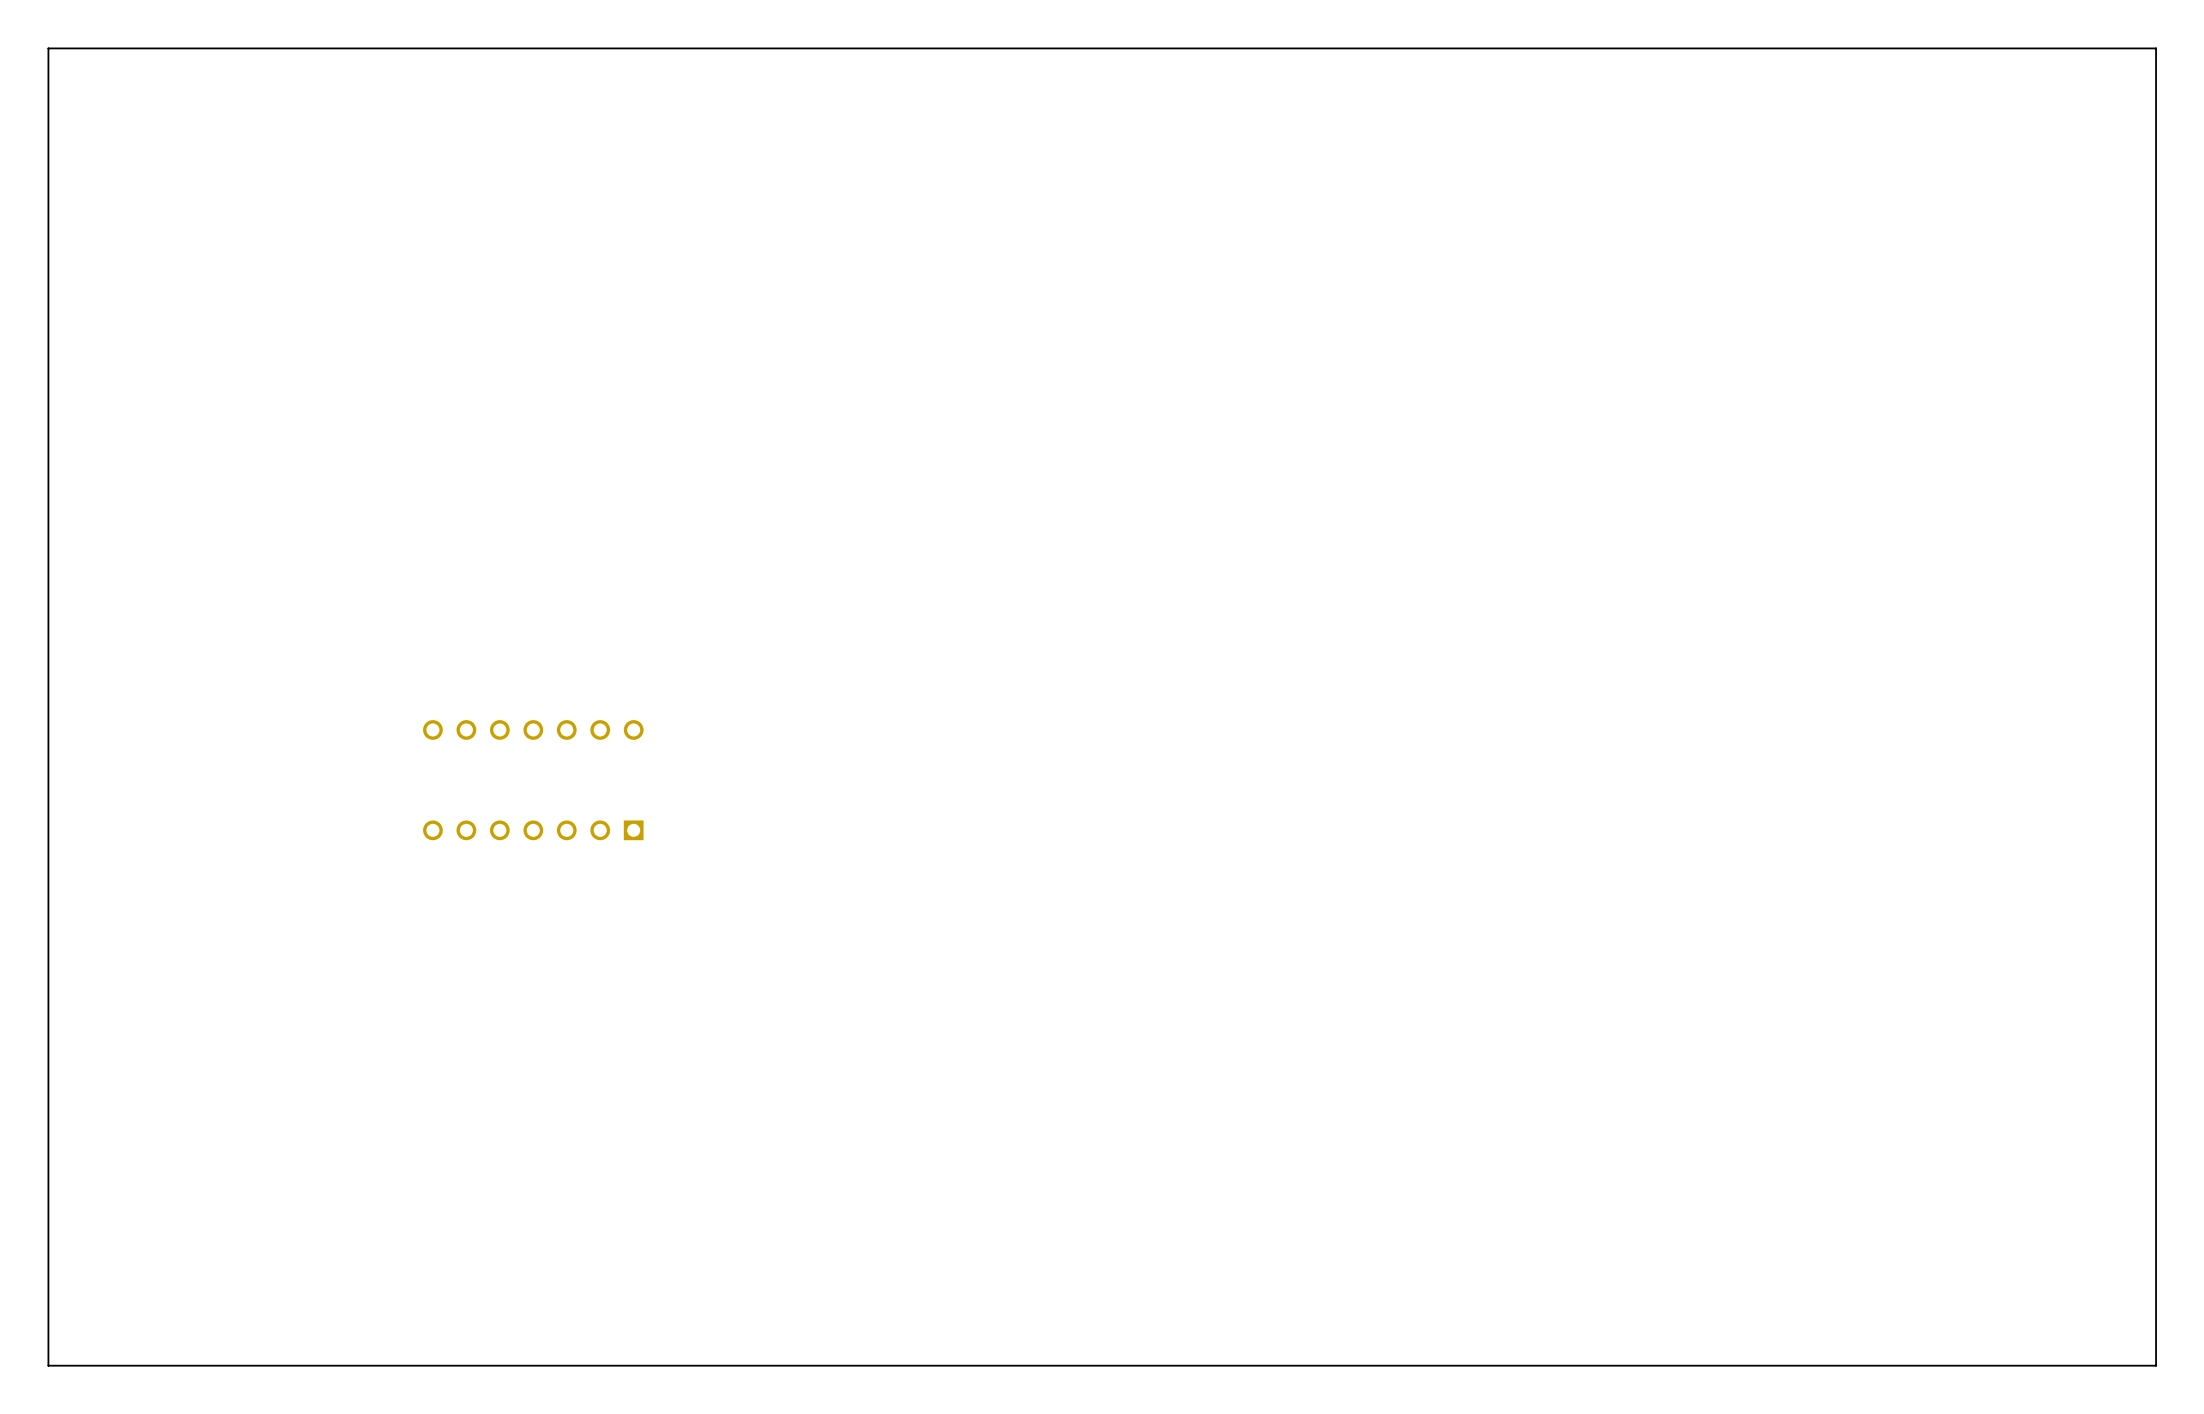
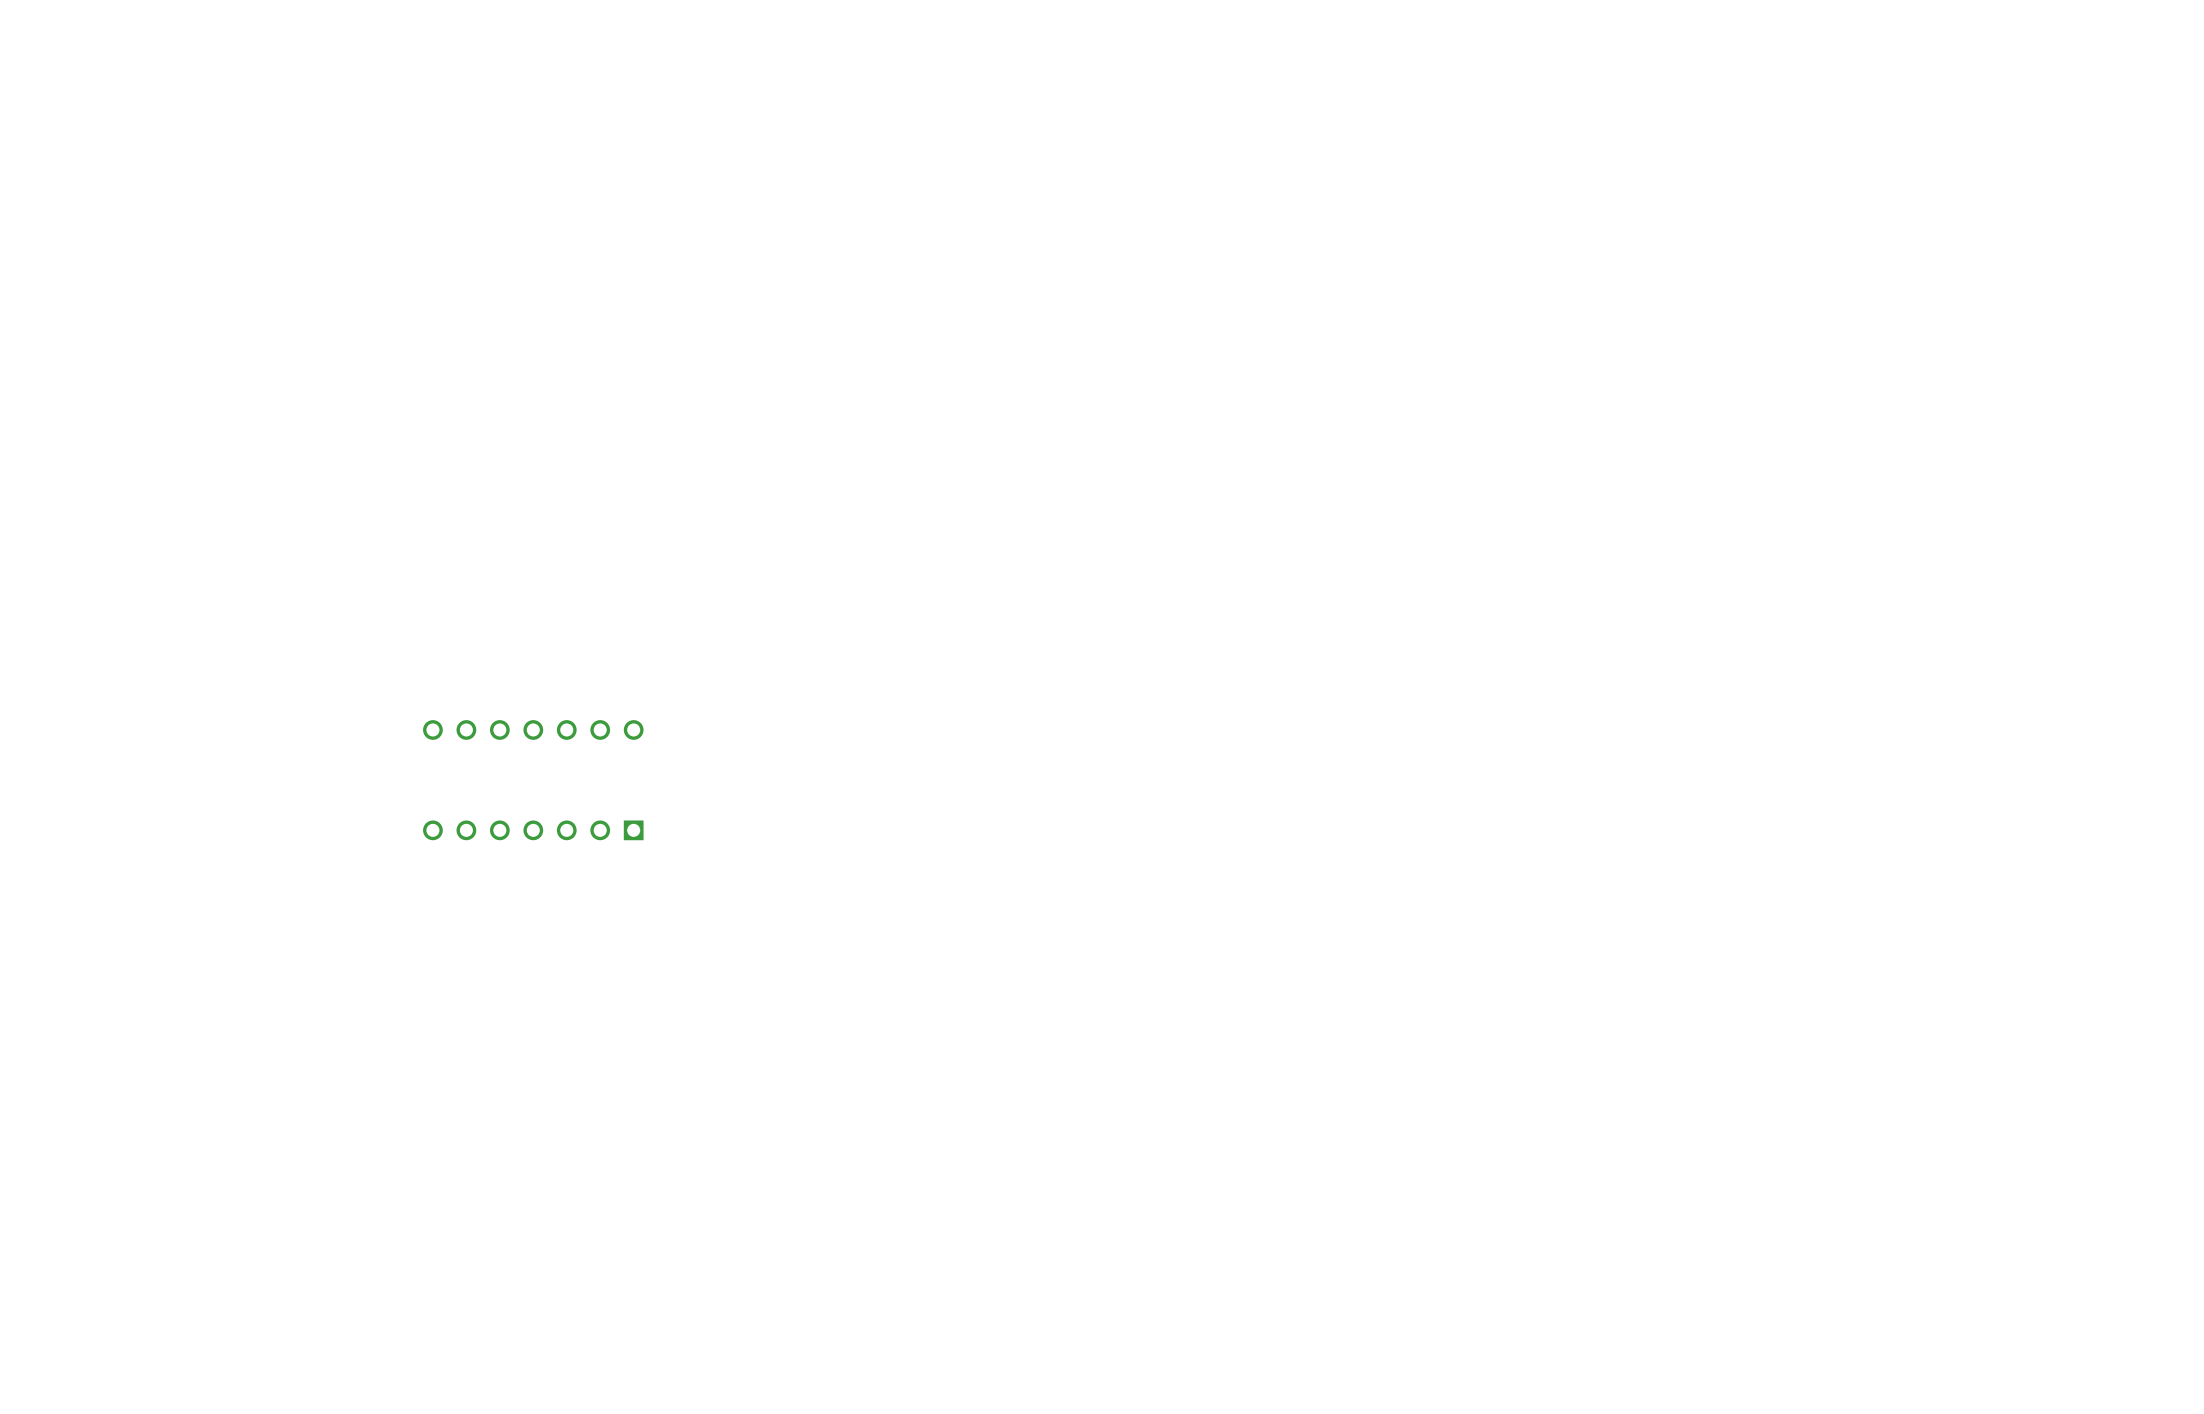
board edge: (2156, 48) (48, 48) (48, 1365) (2156, 1365) (2156, 48) -> none

